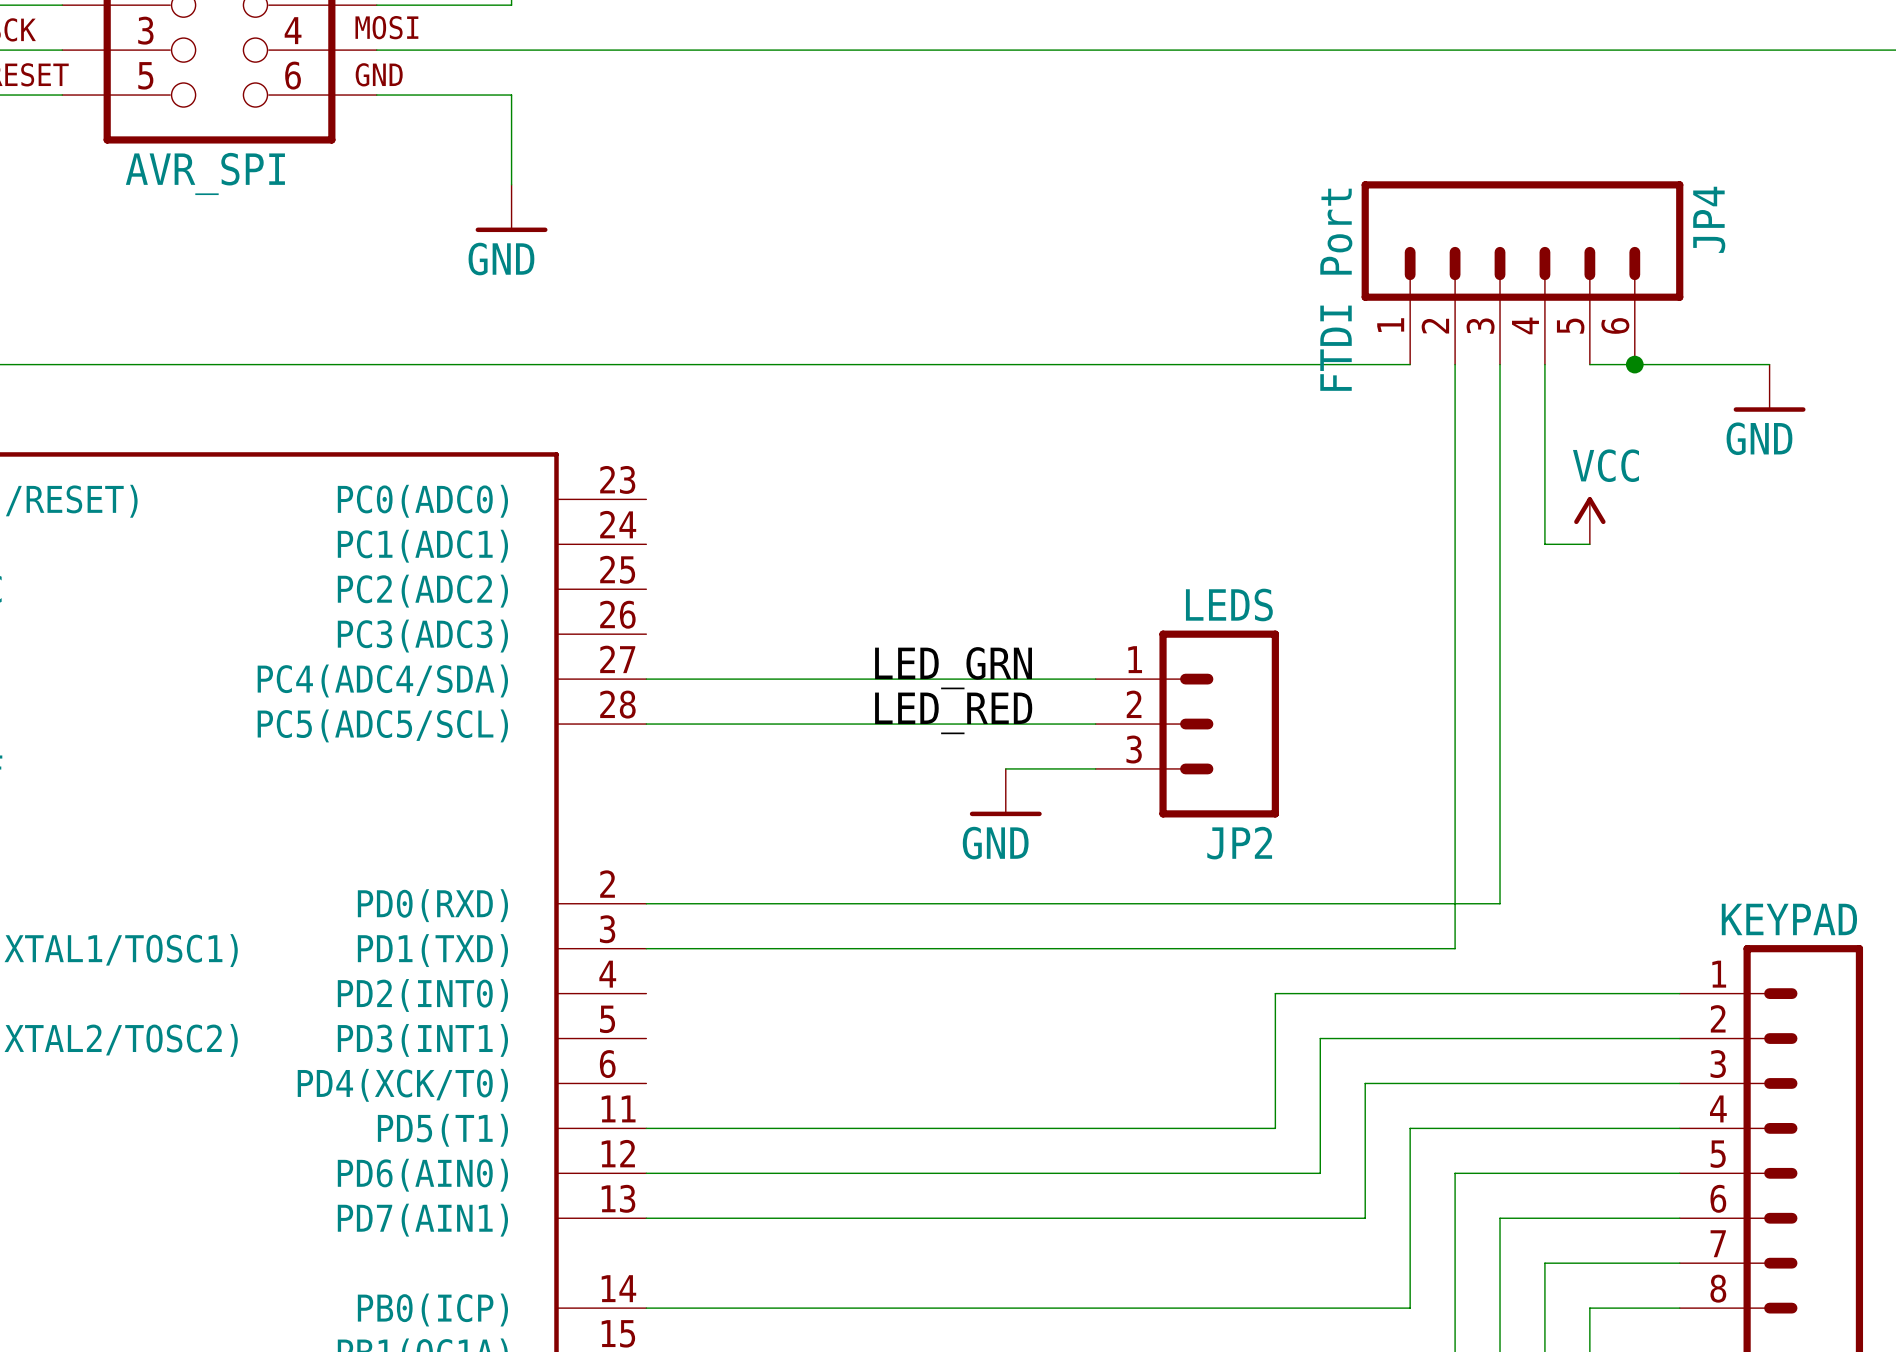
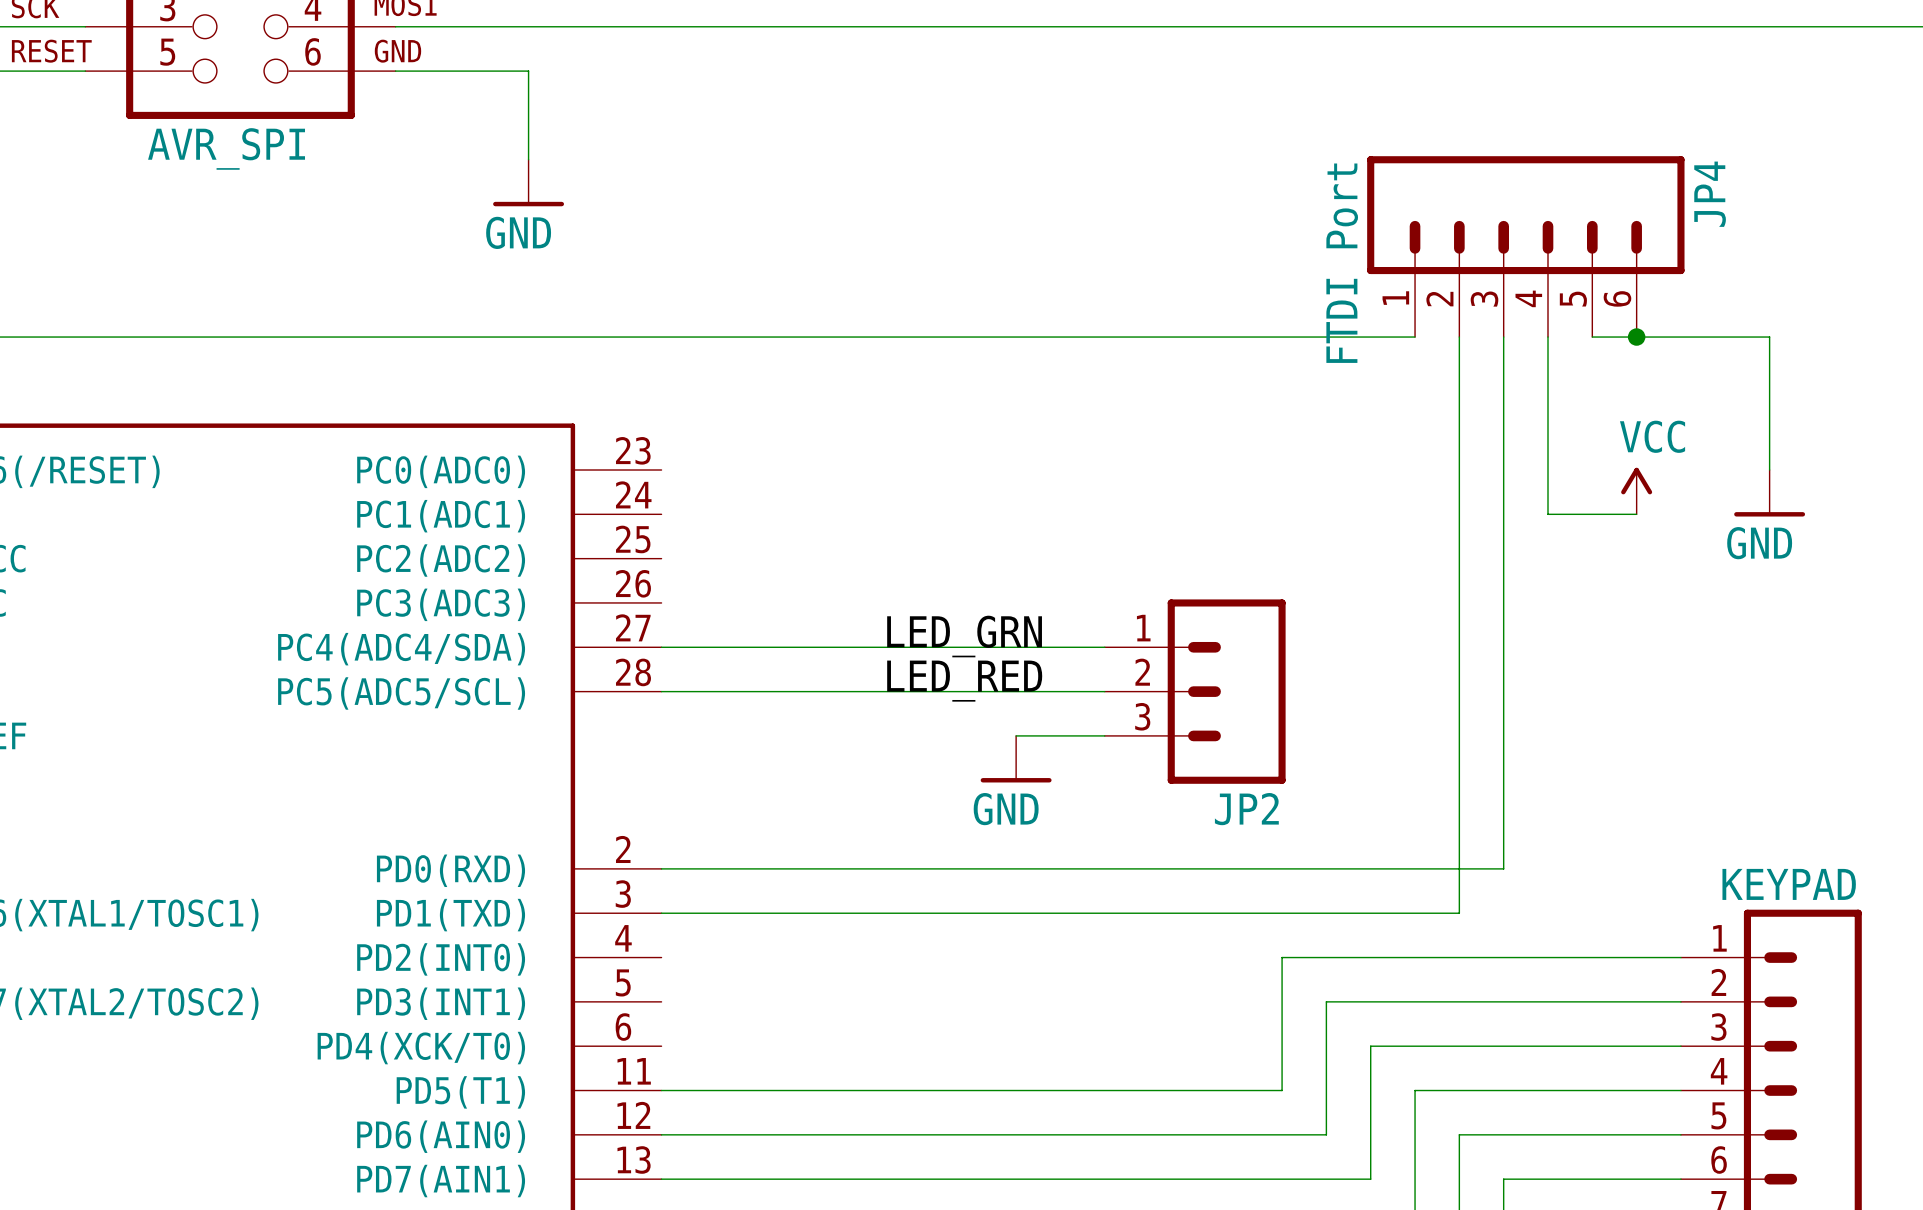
wire: none -> (1769, 337) (1769, 470)
power symbol position: GND (1769, 388) -> GND (1769, 493)
power symbol position: VCC (1589, 520) -> VCC (1636, 491)
wire: none -> (1592, 514) (1636, 514)
JP2 value: LEDS (1229, 604) -> none

